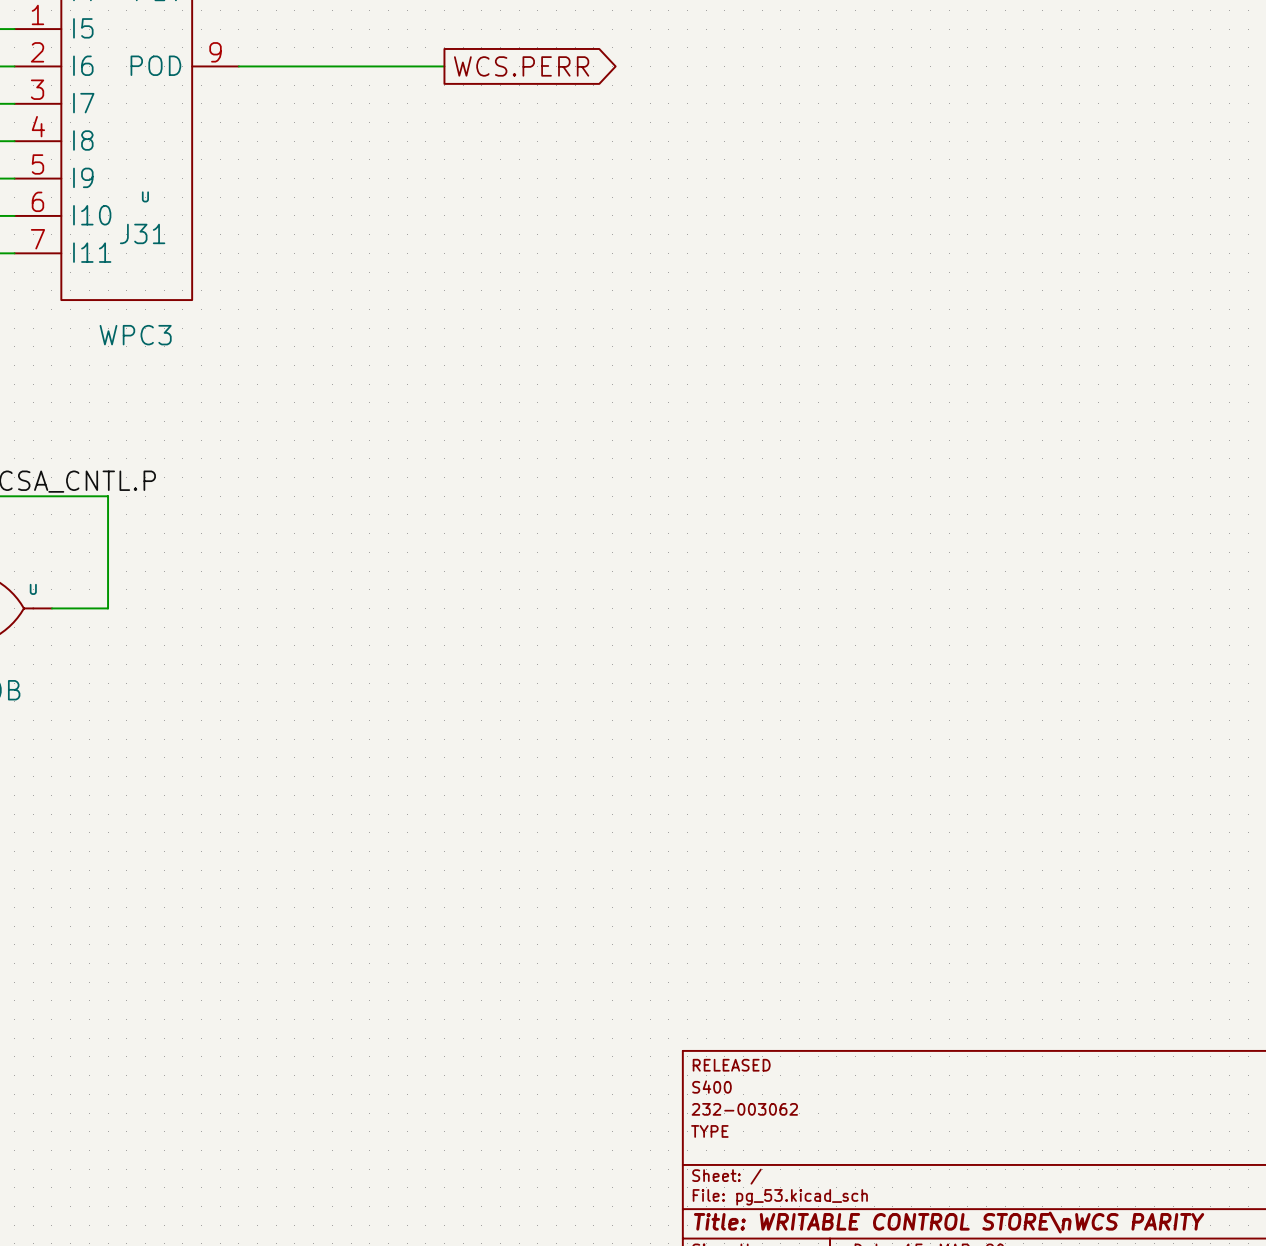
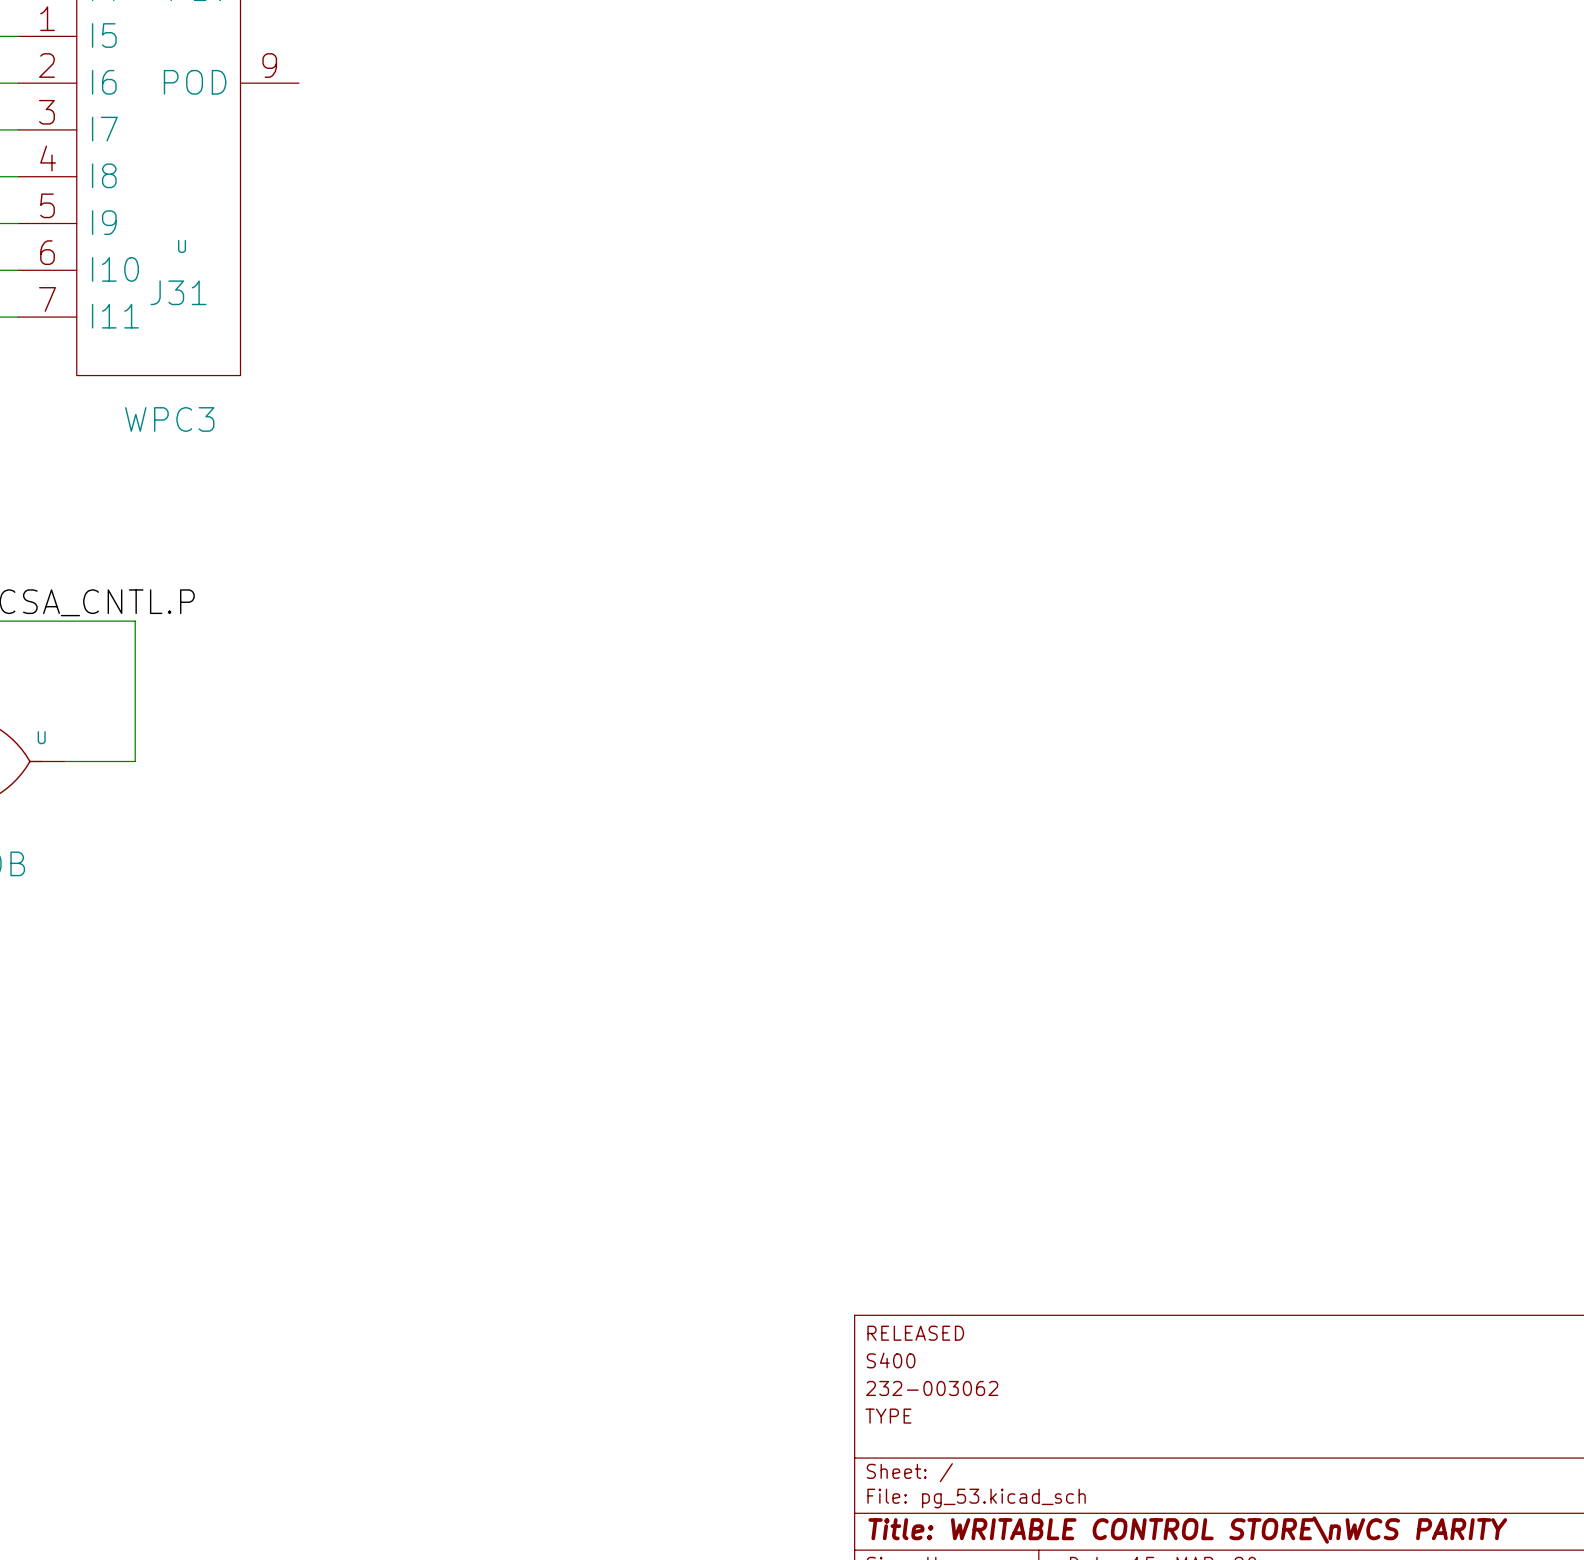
wire: (238, 66) (444, 66) -> none
global label: WCS.PERR (521, 66) -> none

